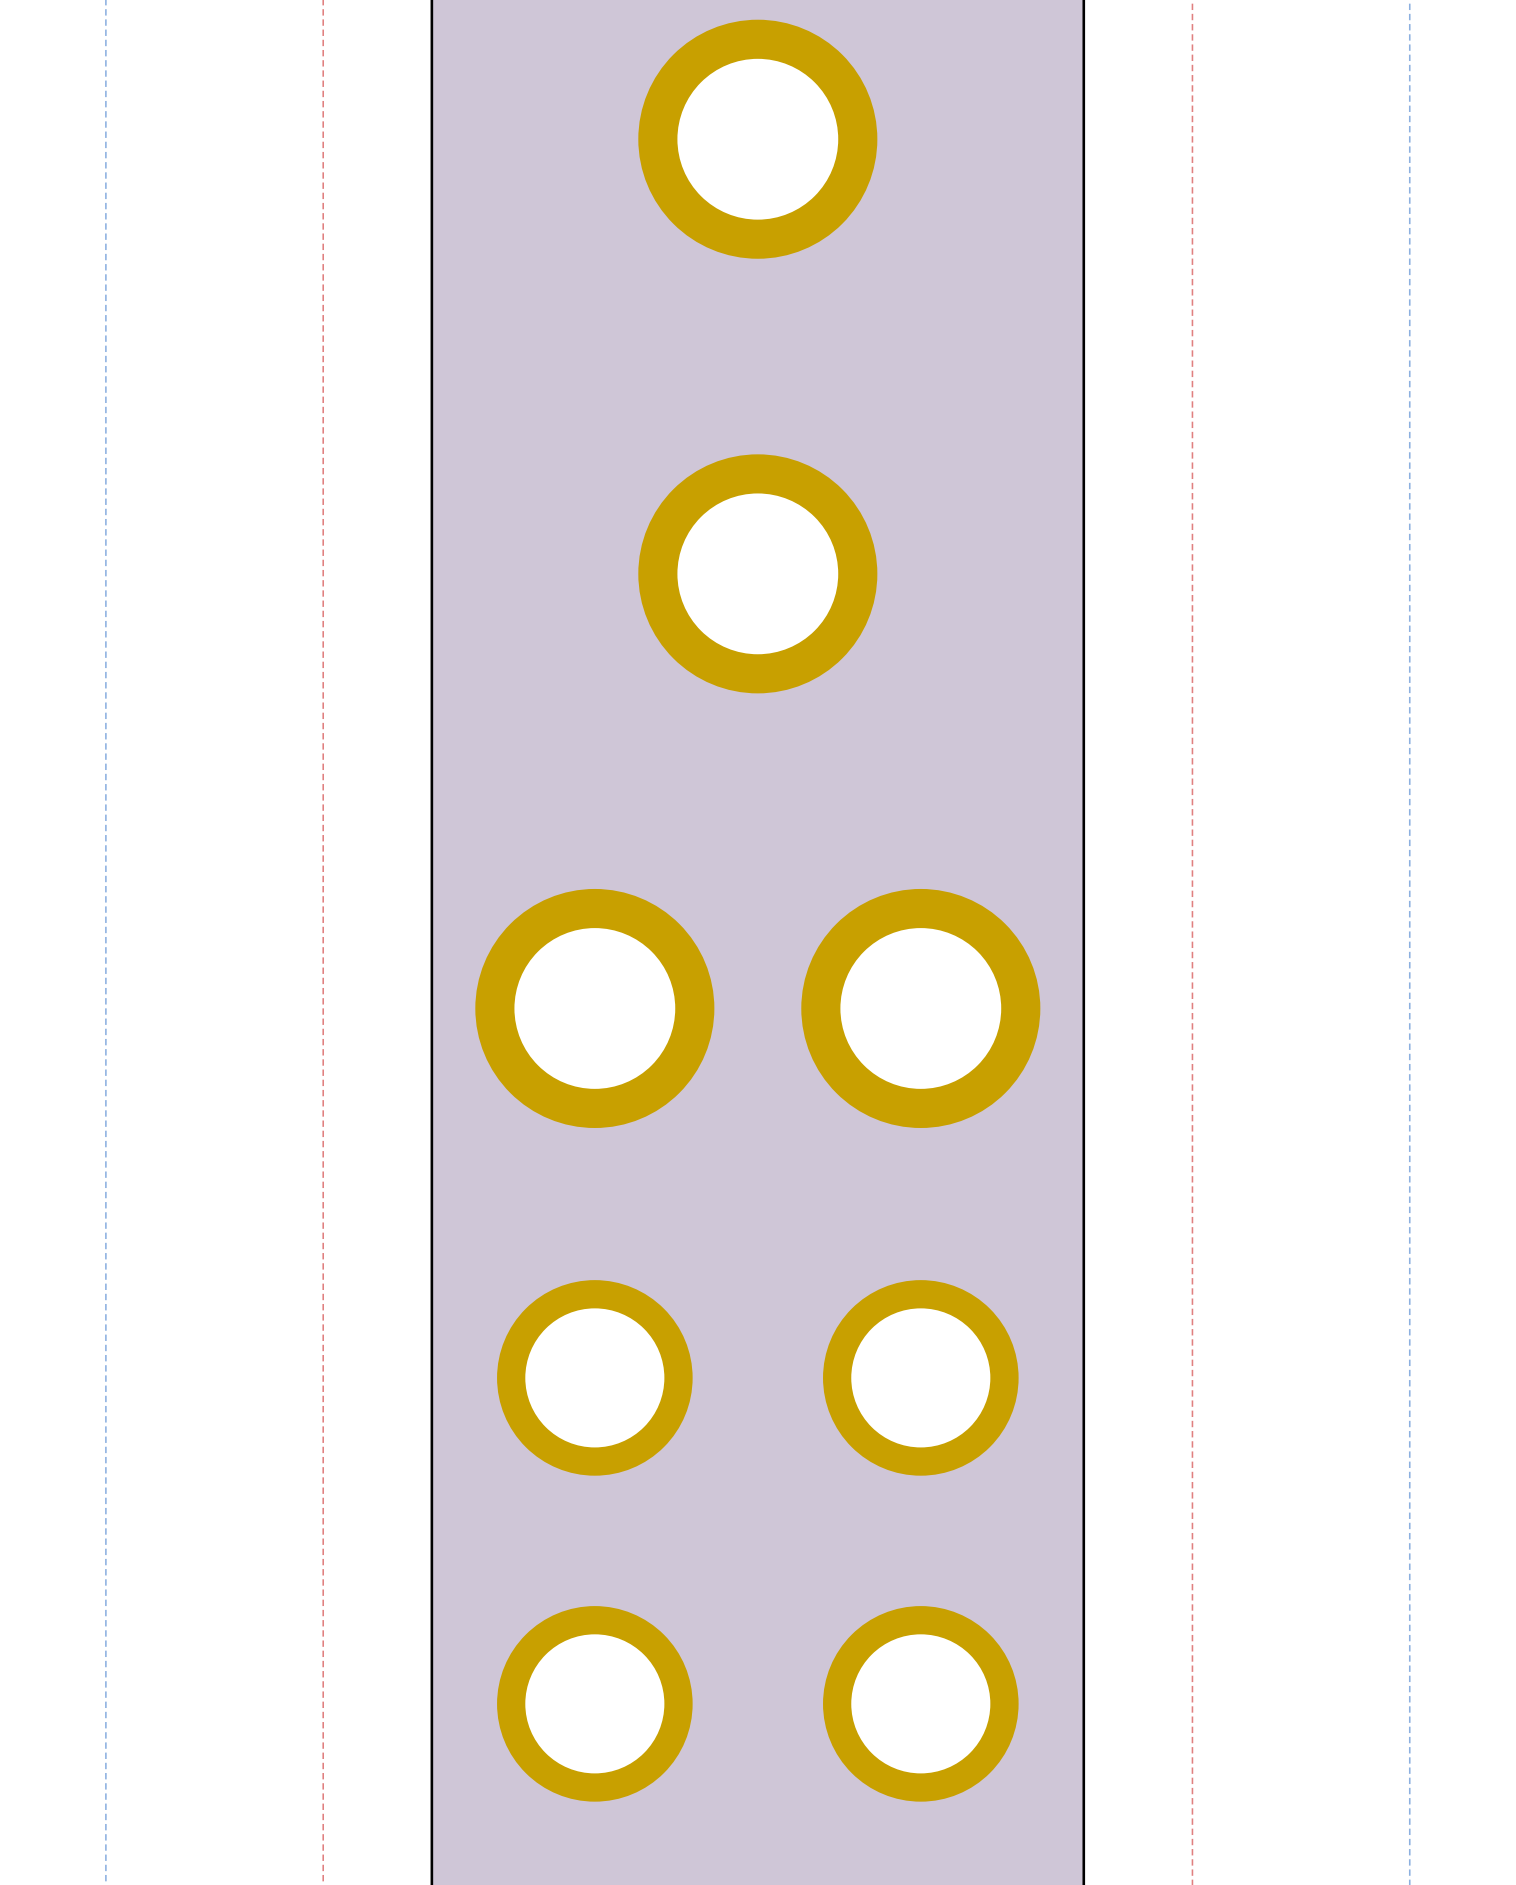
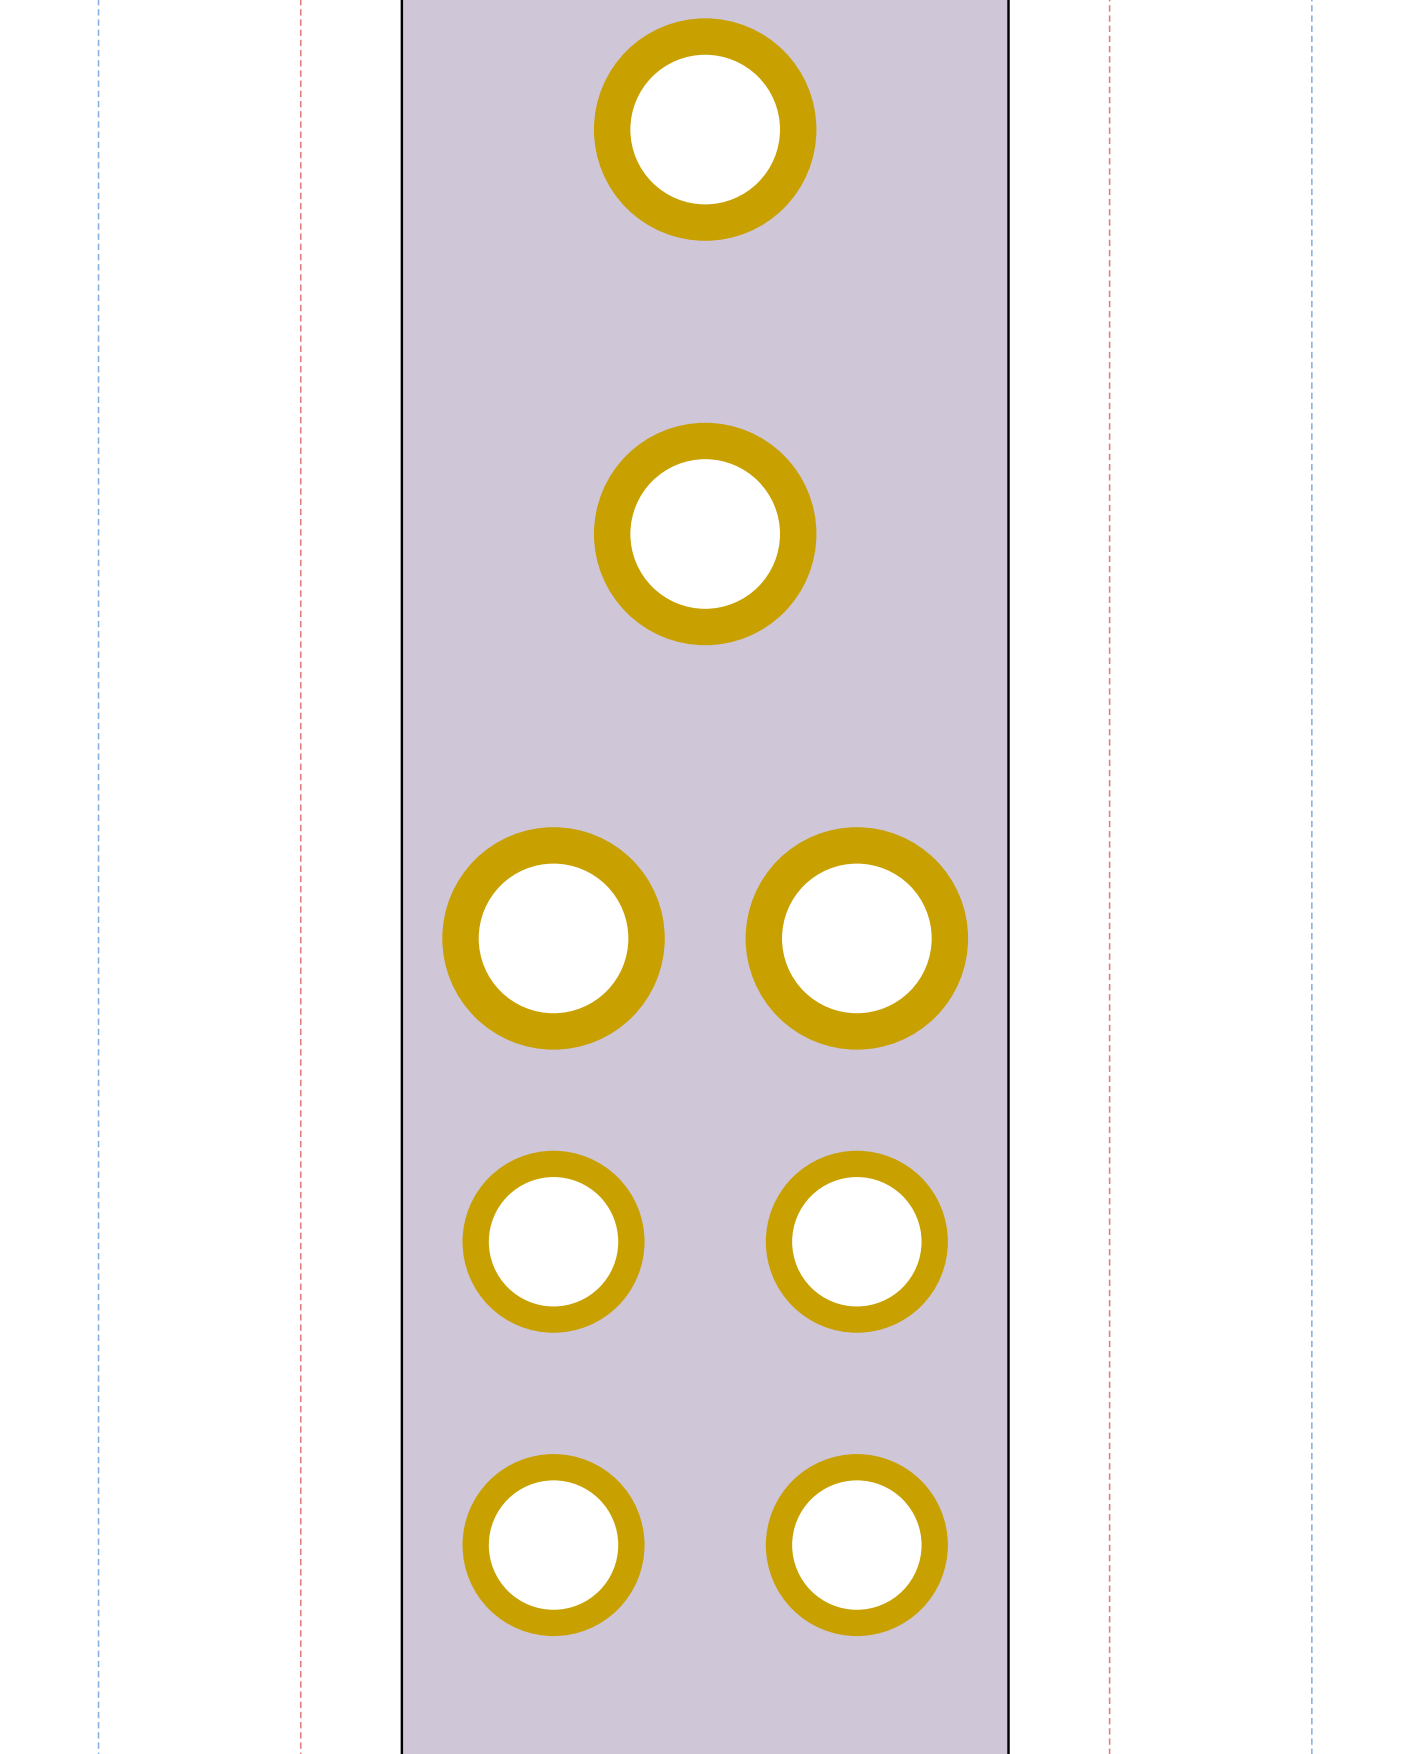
part position: (594, 1377) -> (553, 1241)
part position: (920, 1377) -> (856, 1241)
part position: (594, 1703) -> (553, 1545)
part position: (920, 1703) -> (856, 1545)

